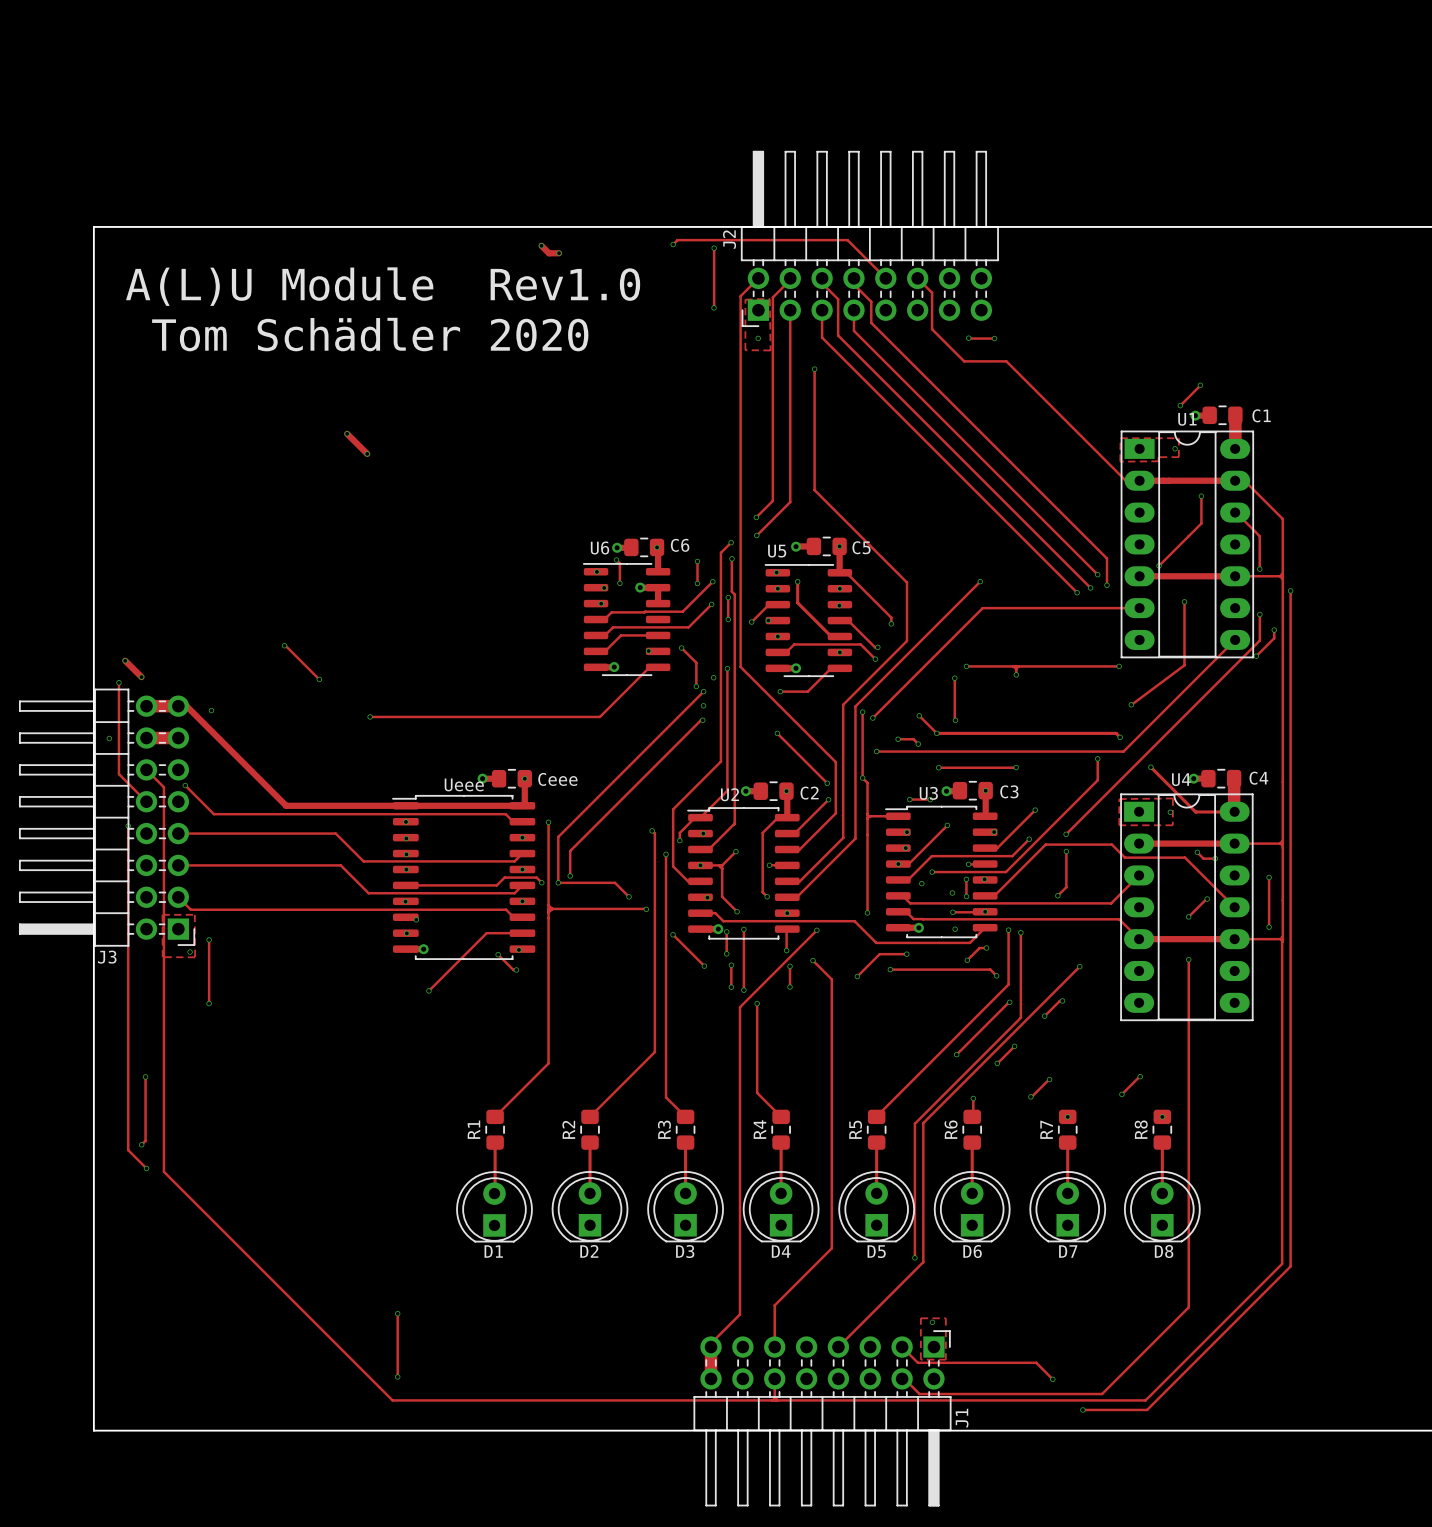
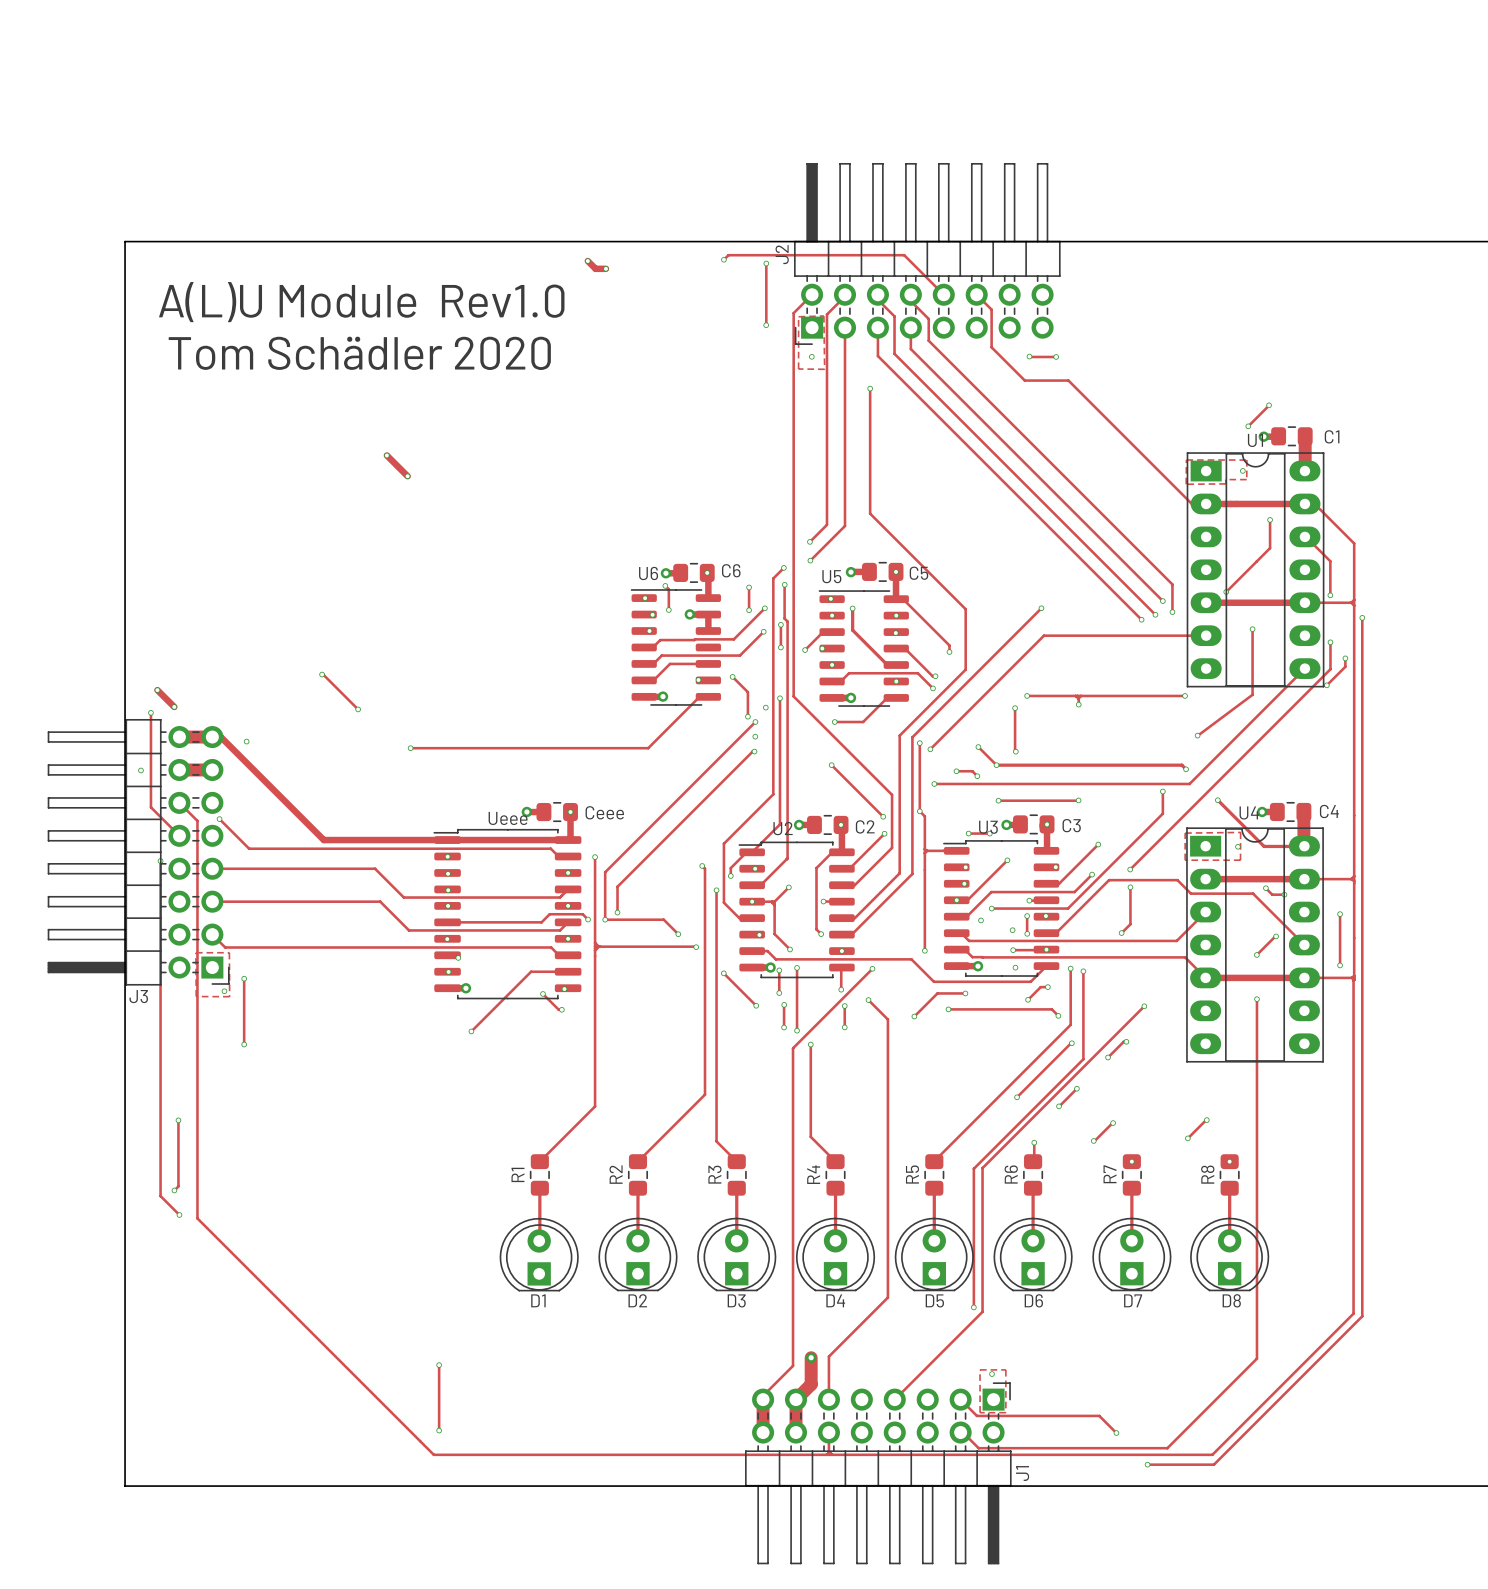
track: none -> (811, 1357) (811, 1384) (796, 1399) (796, 1432)
via: none -> (811, 1357)

